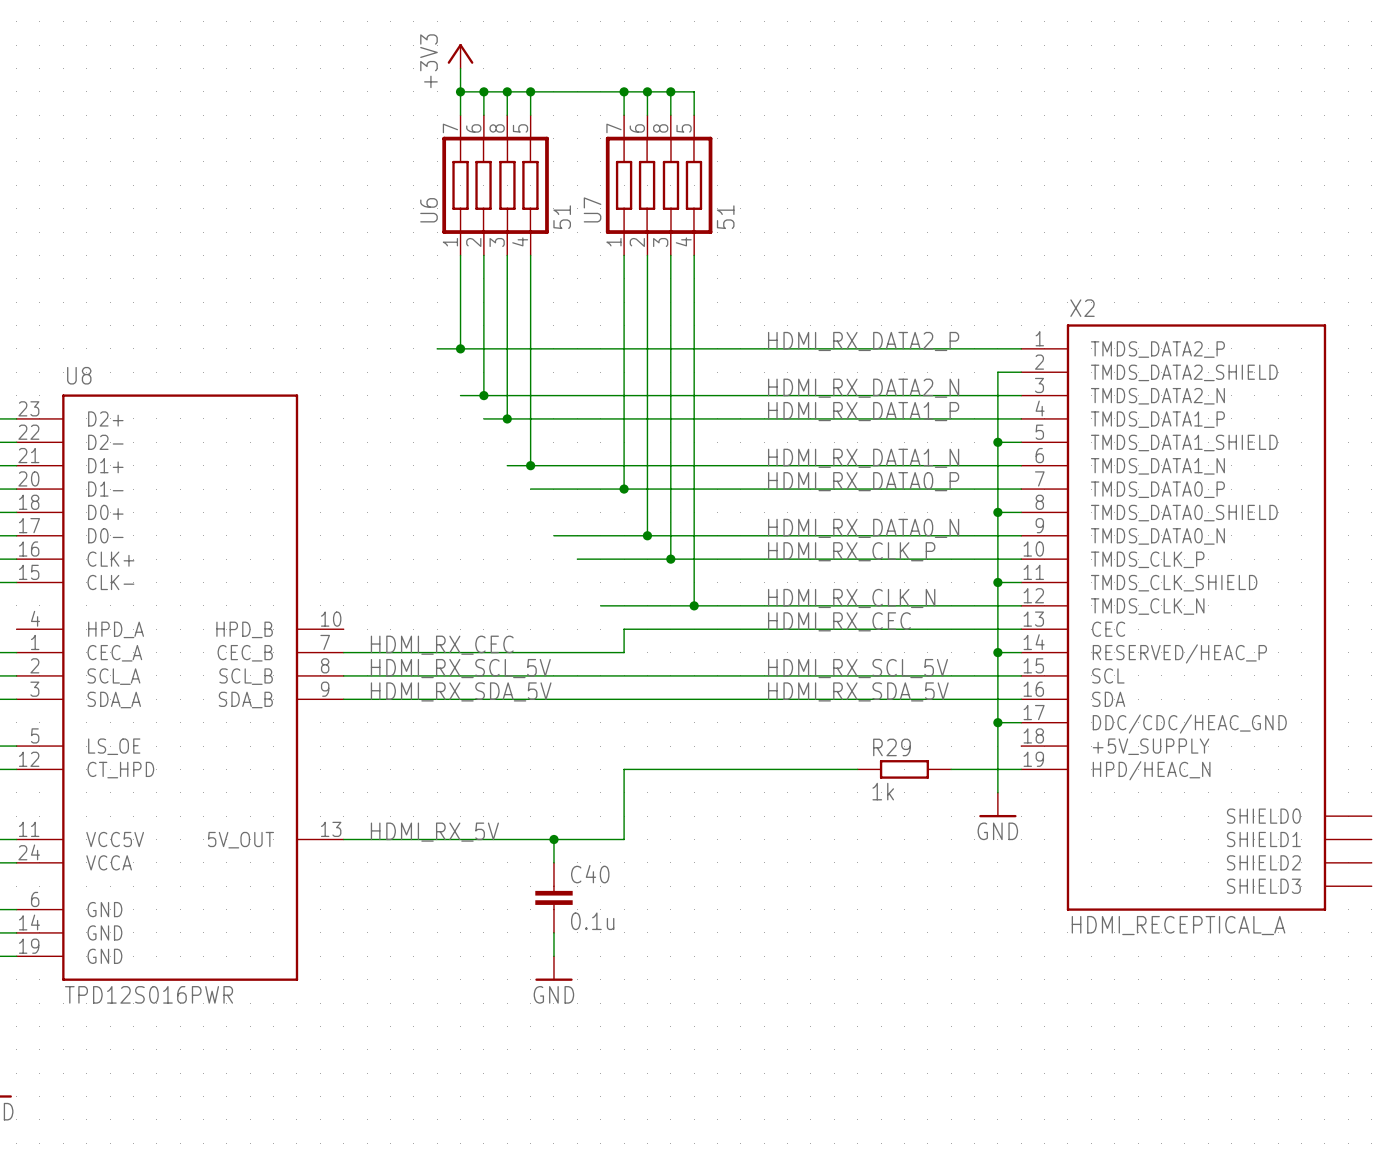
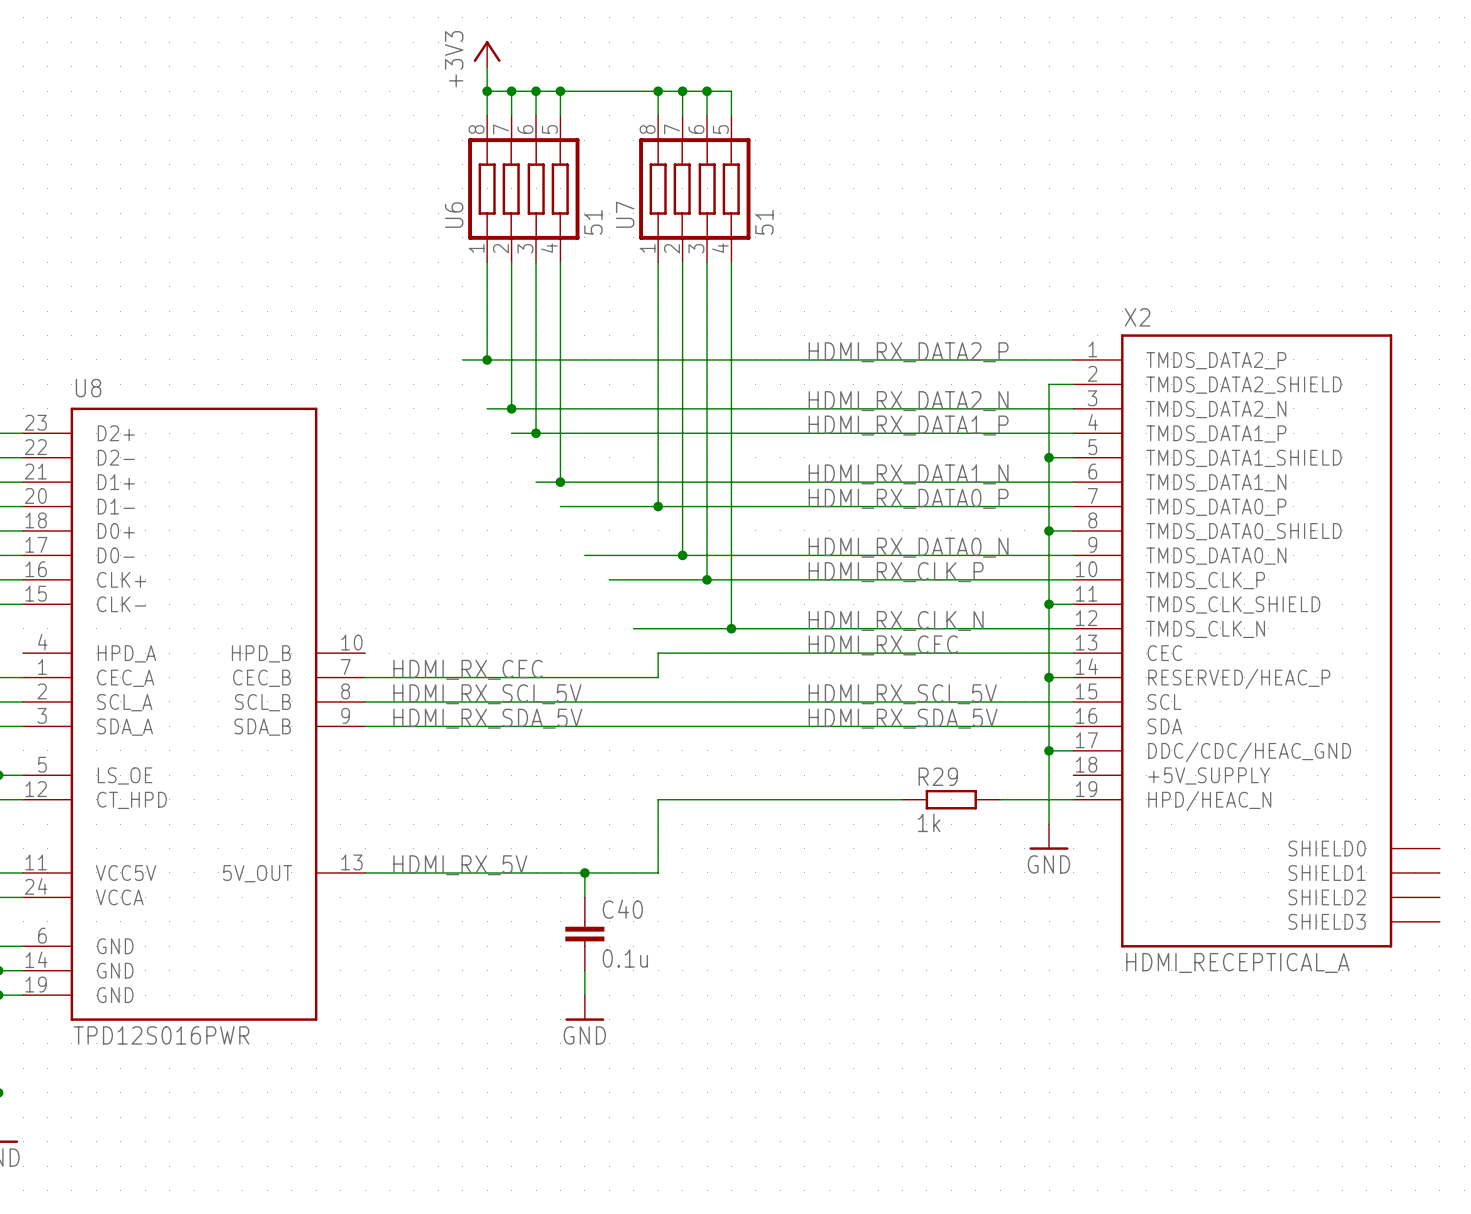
U6 pin number: 7 (450, 128) -> 8 (476, 129)
U6 pin number: 6 (473, 128) -> 7 (501, 129)
U6 pin number: 8 (497, 128) -> 6 (525, 129)
U7 pin number: 7 (613, 128) -> 8 (647, 129)
U7 pin number: 6 (637, 128) -> 7 (672, 129)
U7 pin number: 8 (660, 128) -> 6 (696, 129)

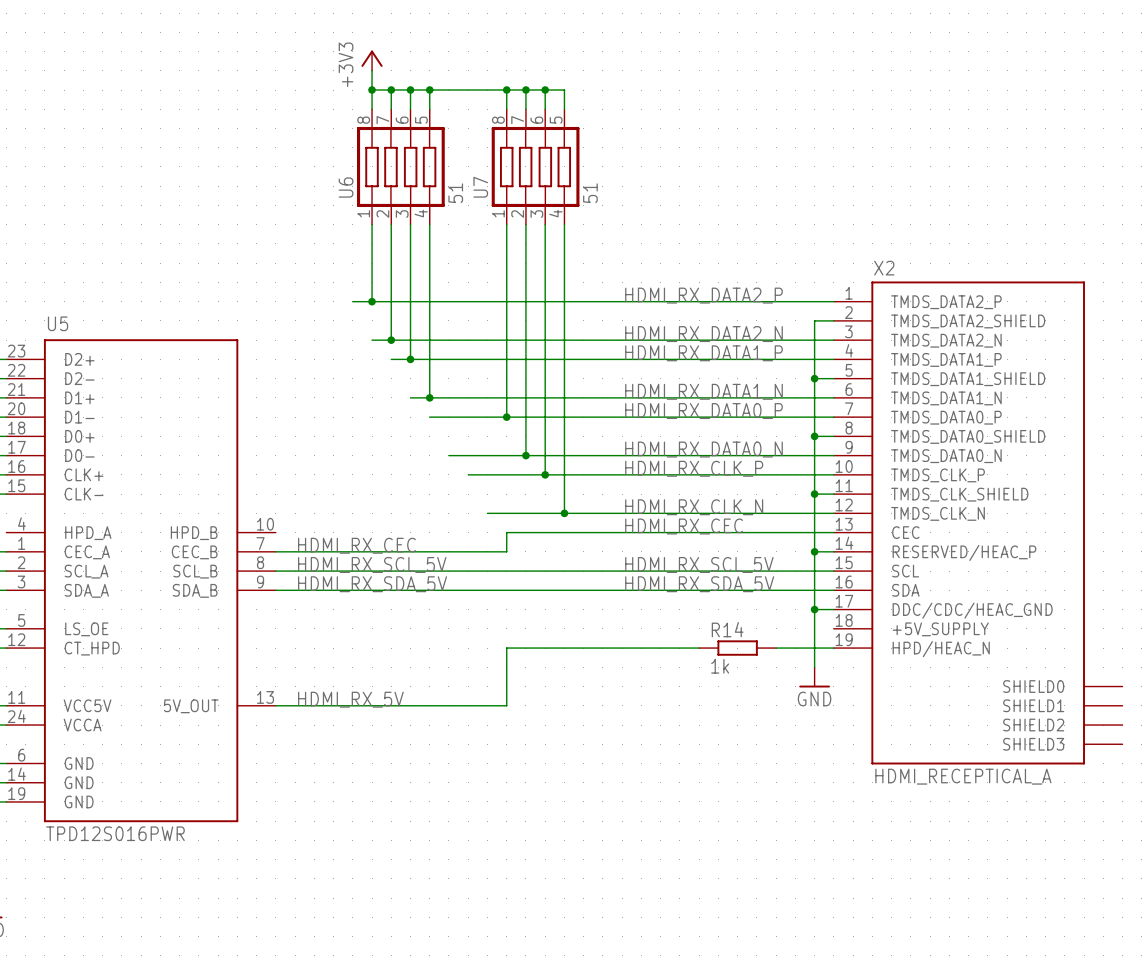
U8 name: U8 (88, 388) -> U5 (58, 323)
R29 name: R29 (938, 776) -> R14 (727, 629)
wire: (584, 872) (584, 897) -> none
junction: (584, 872) -> none
C40: 0.1u (584, 934) -> none
wire: (584, 970) (584, 995) -> none
power symbol: GND (584, 1007) -> none

